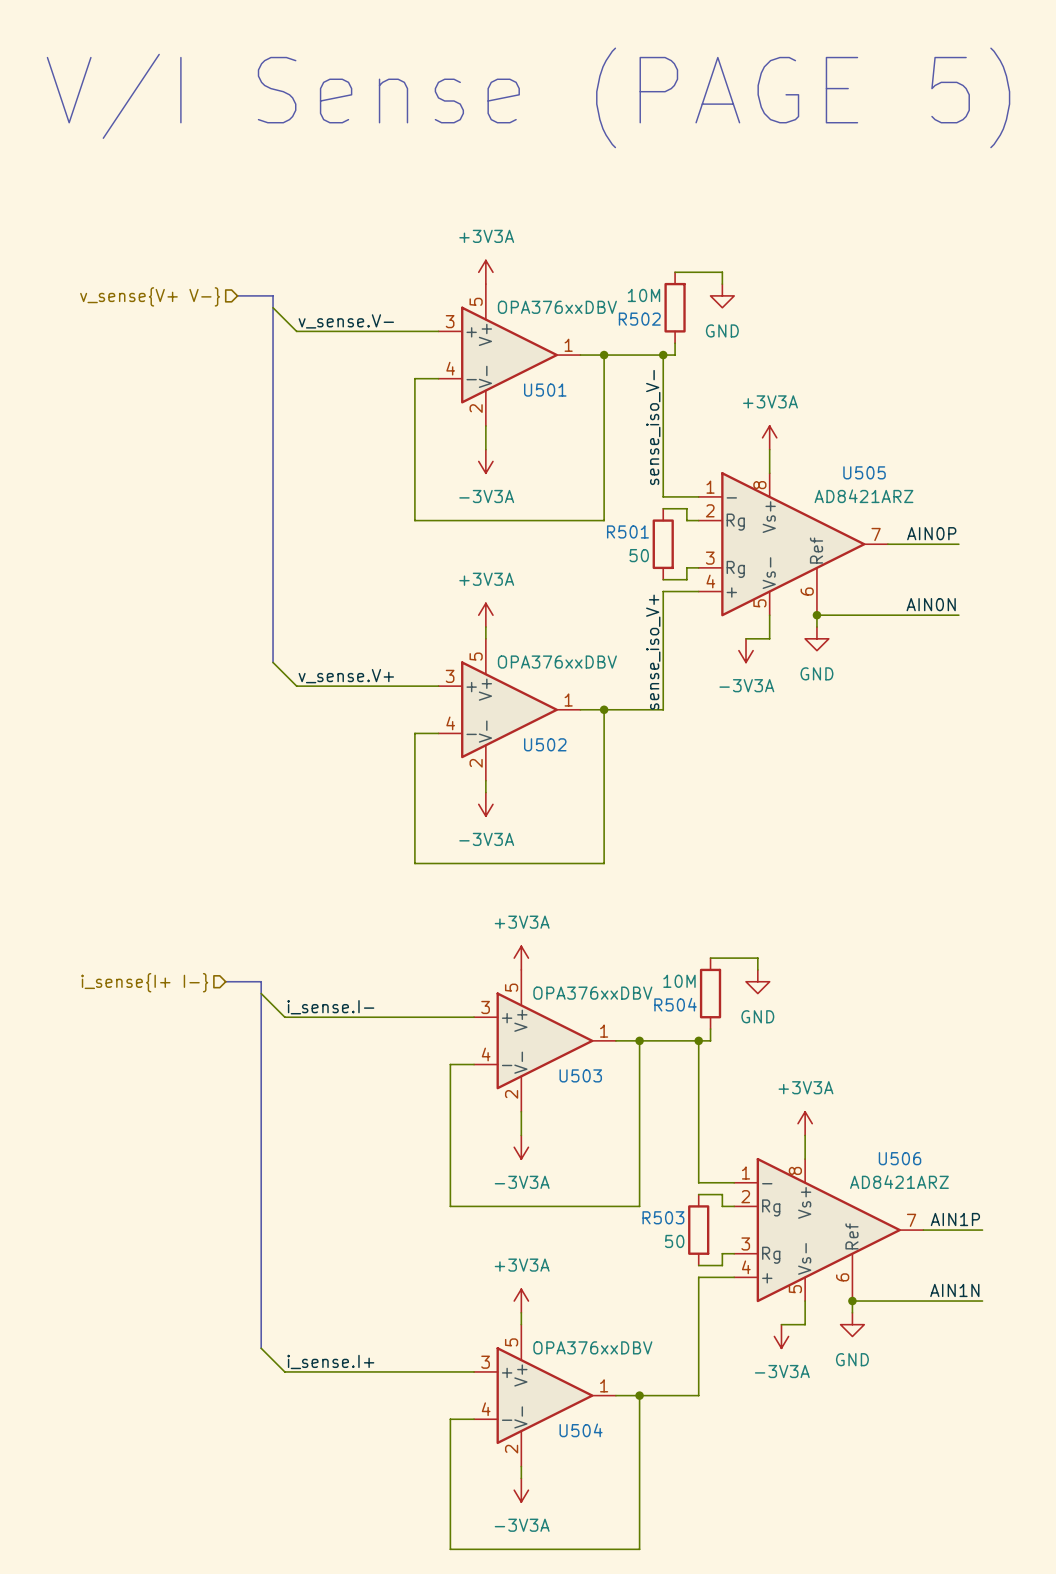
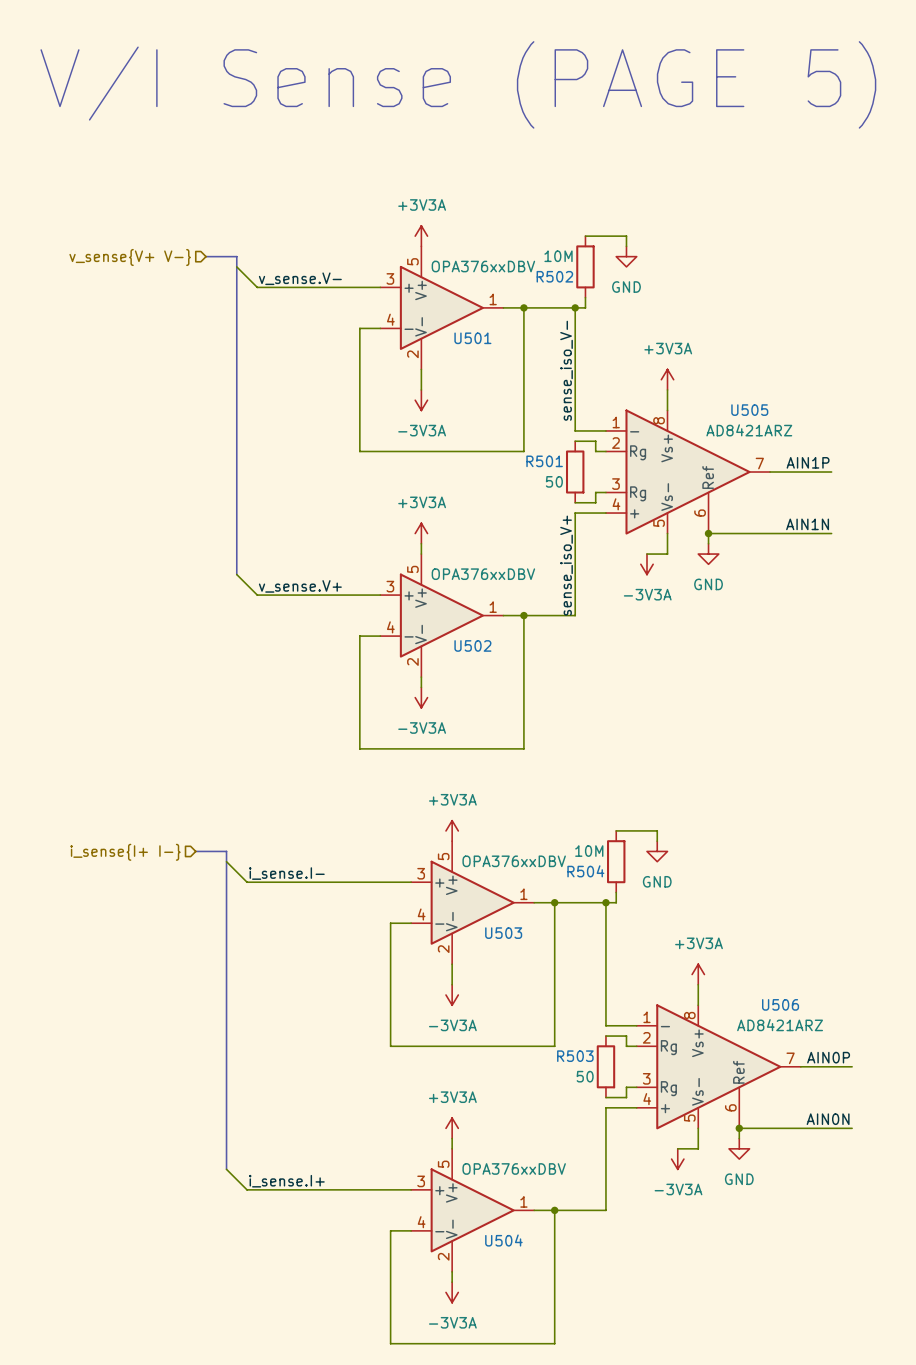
label: AIN0P (931, 533) -> AIN1P (808, 462)
label: AIN0N (931, 604) -> AIN1N (807, 524)
label: AIN1P (955, 1219) -> AIN0P (828, 1057)
label: AIN1N (954, 1290) -> AIN0N (828, 1119)

